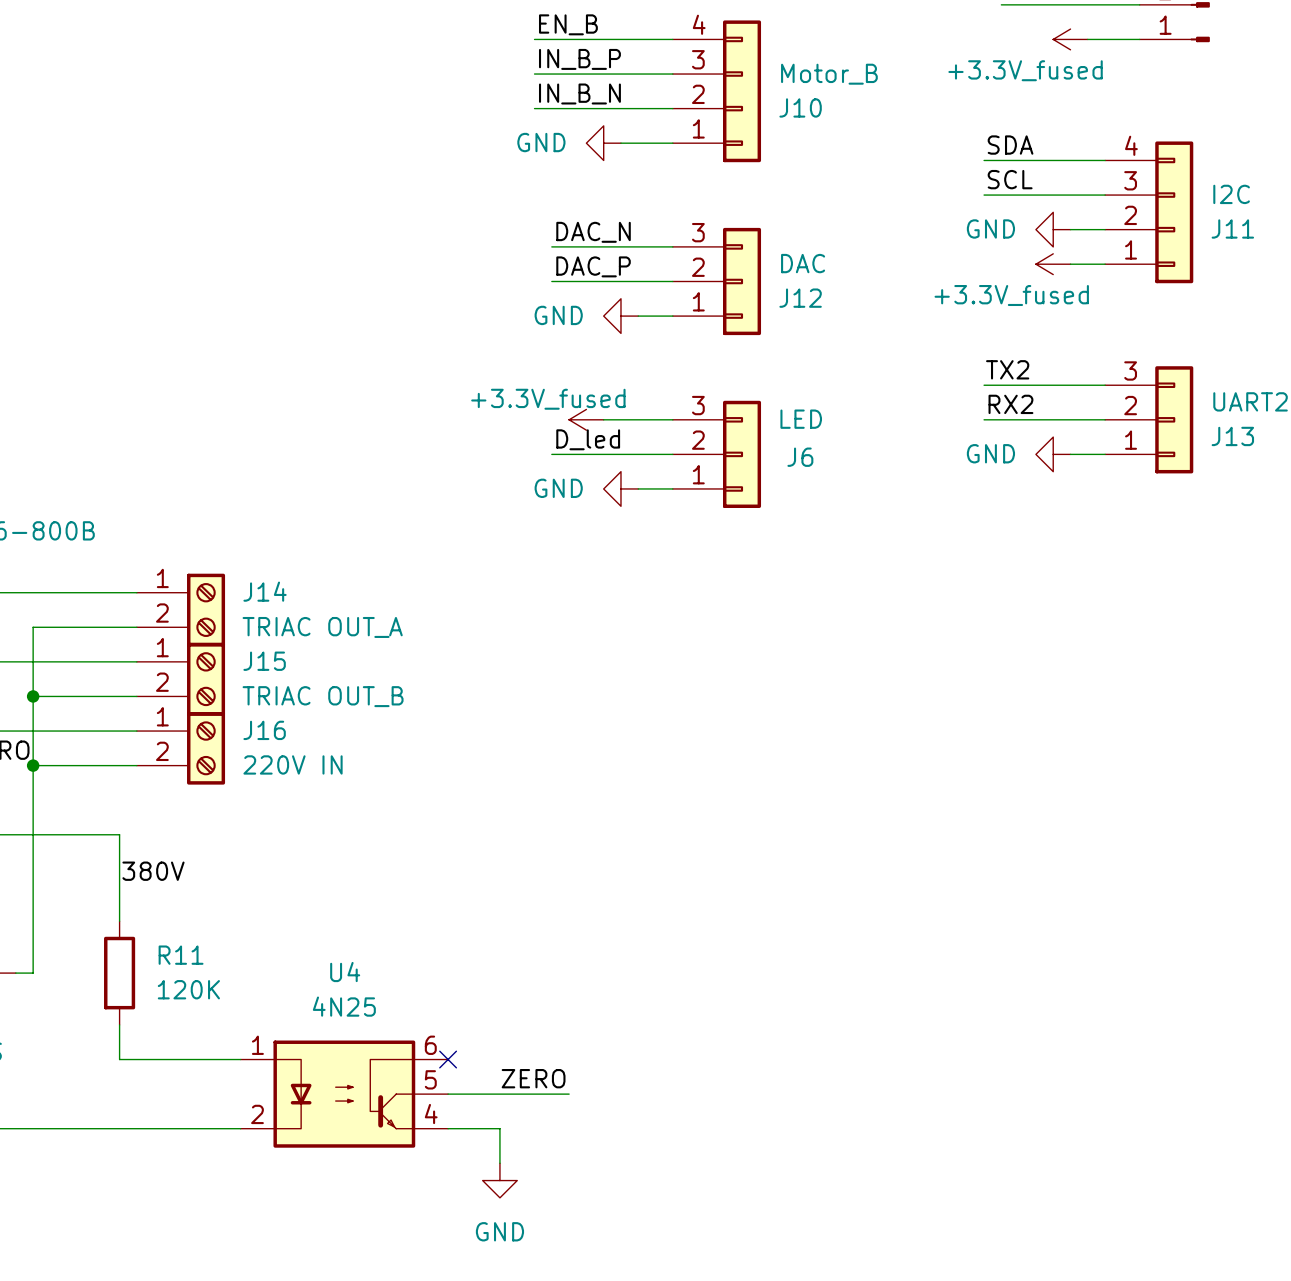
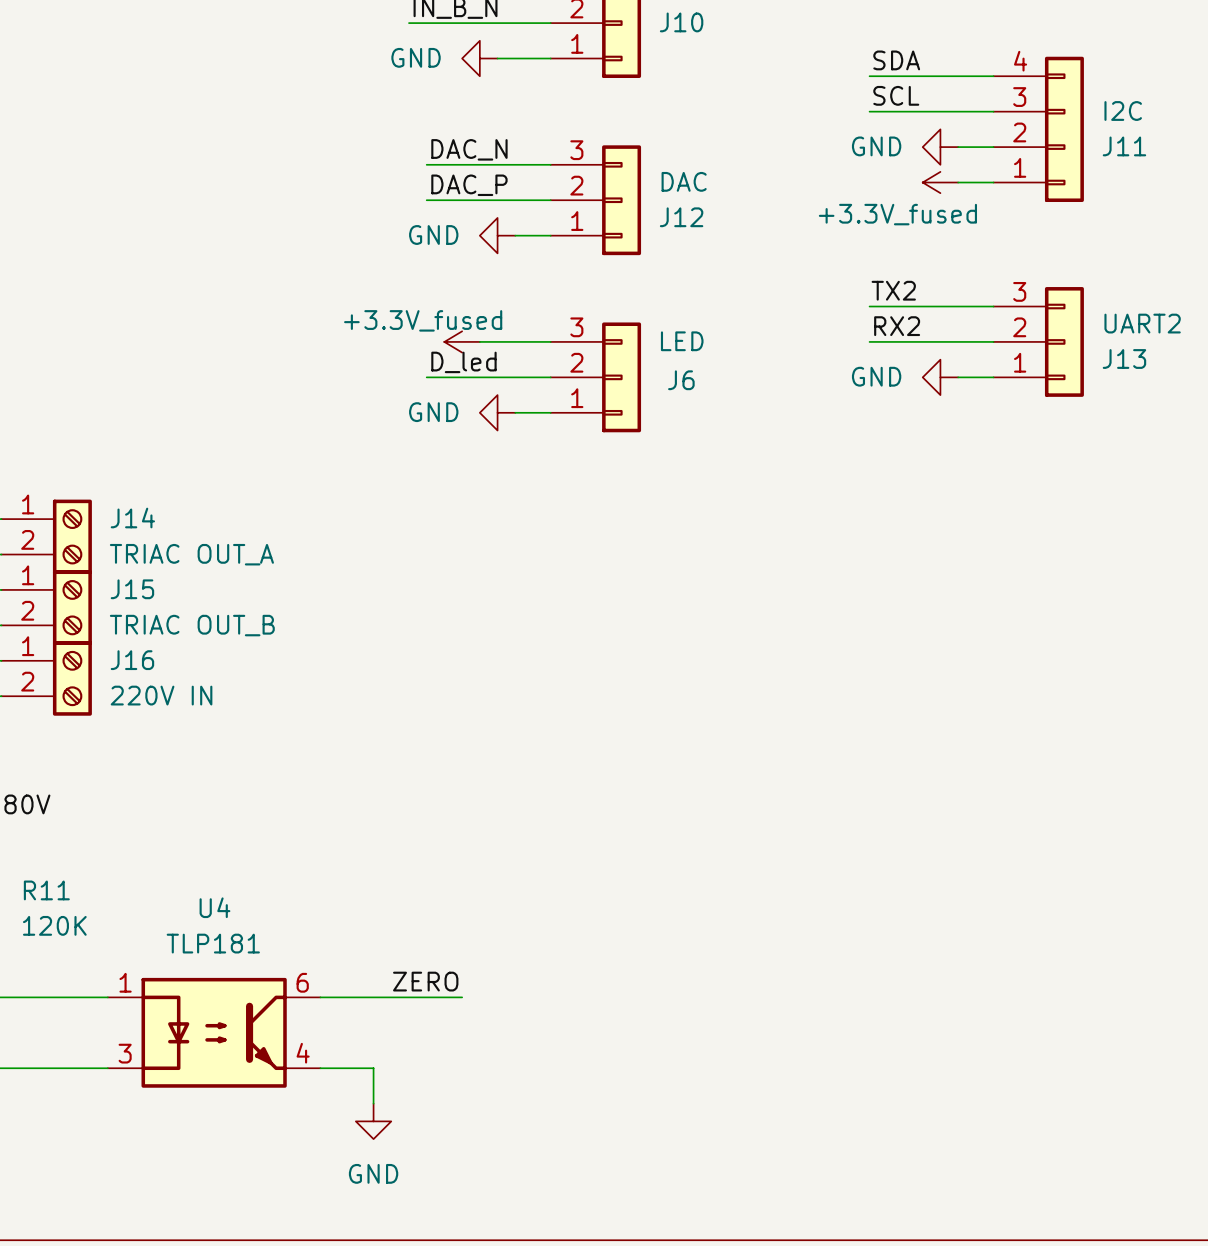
U4 value: 4N25 (344, 1006) -> TLP181 (213, 943)
U4 symbol: [240, 1040, 449, 1148] -> [107, 977, 321, 1088]
wire: none -> (320, 997) (462, 997)
no-connect mark: (448, 1059) -> none
label position: ZERO (533, 1078) -> ZERO (425, 981)
wire: (448, 1094) (569, 1094) -> none

